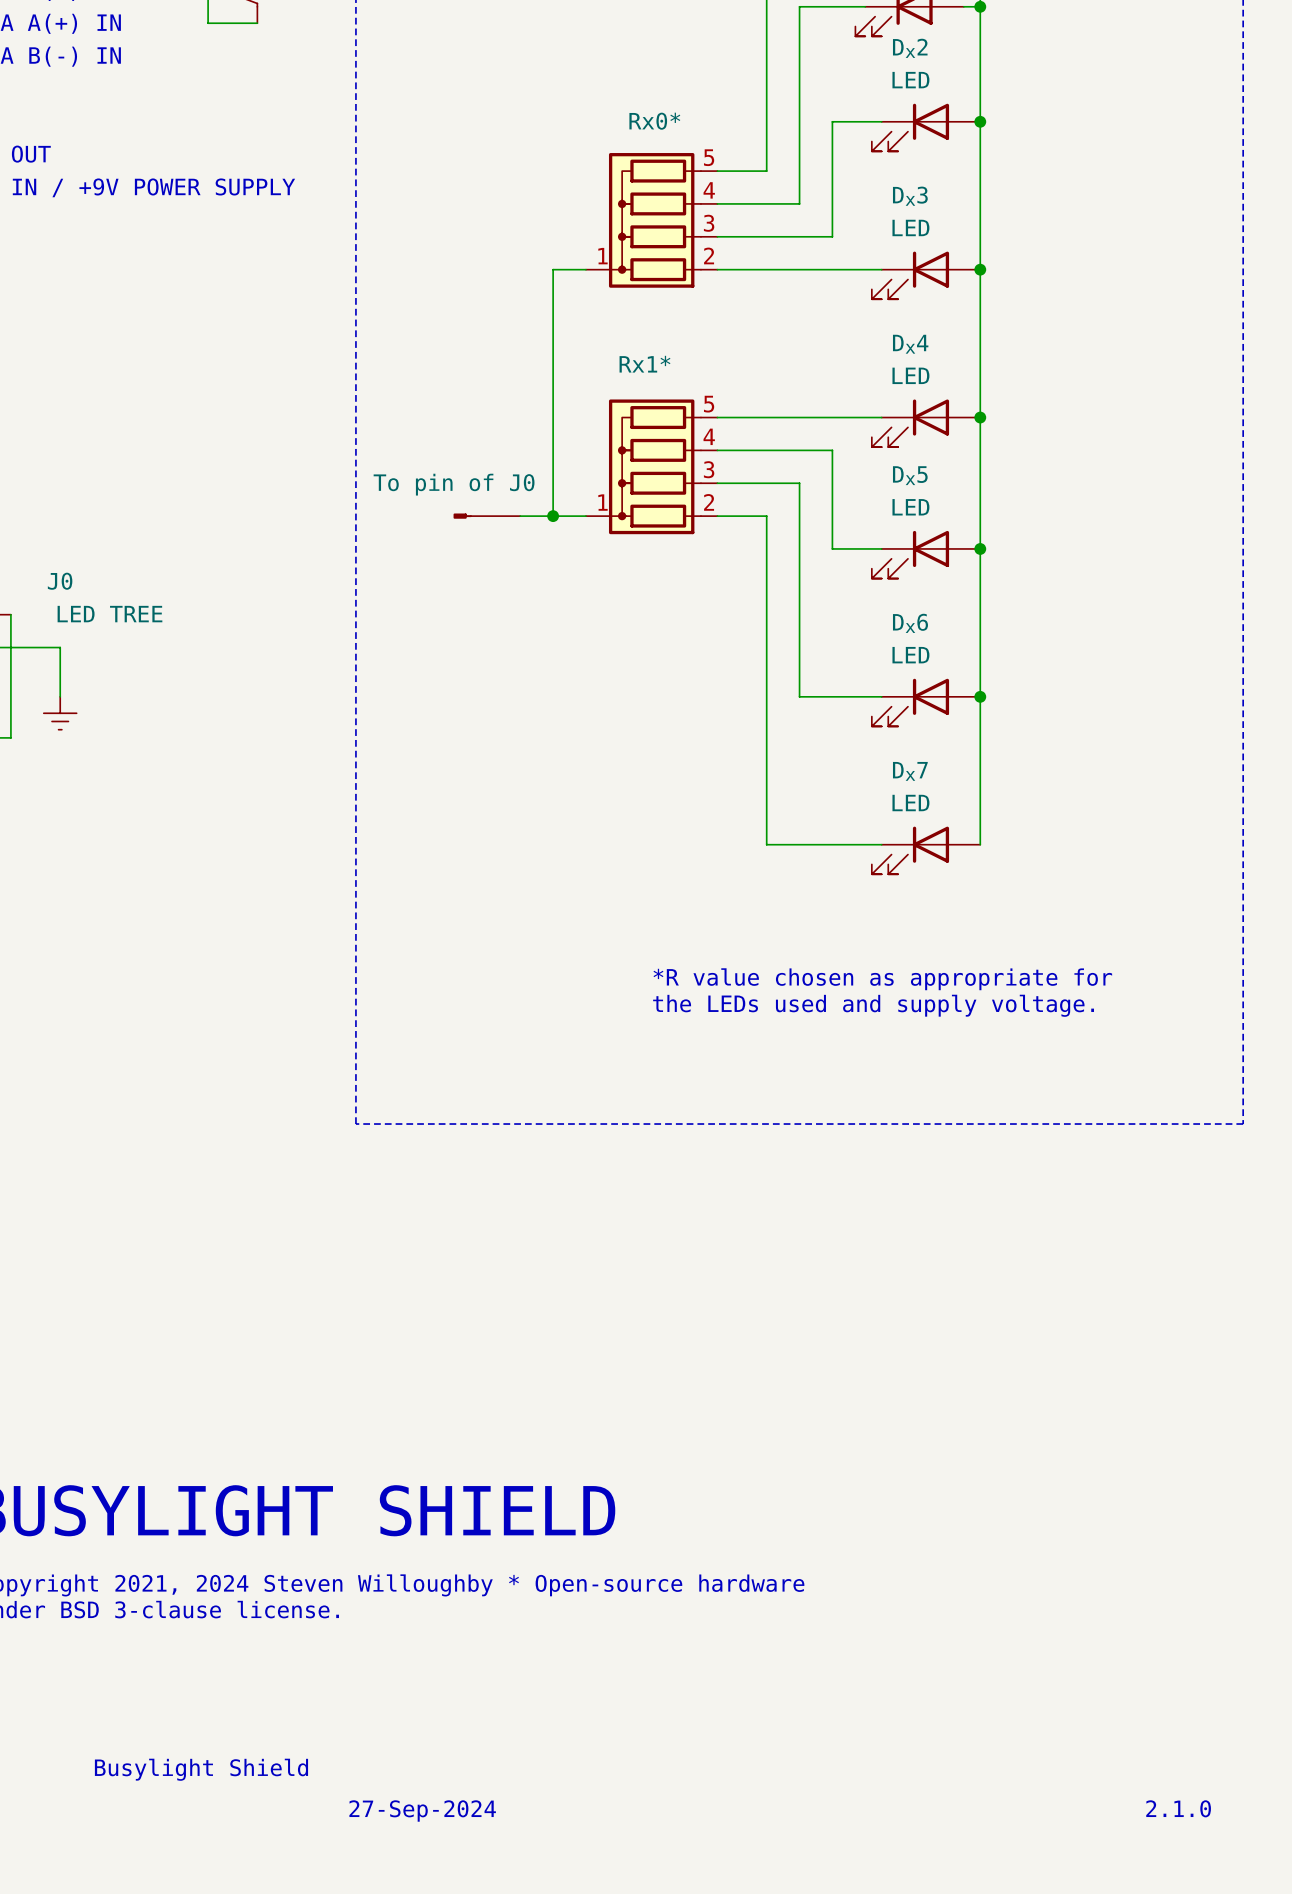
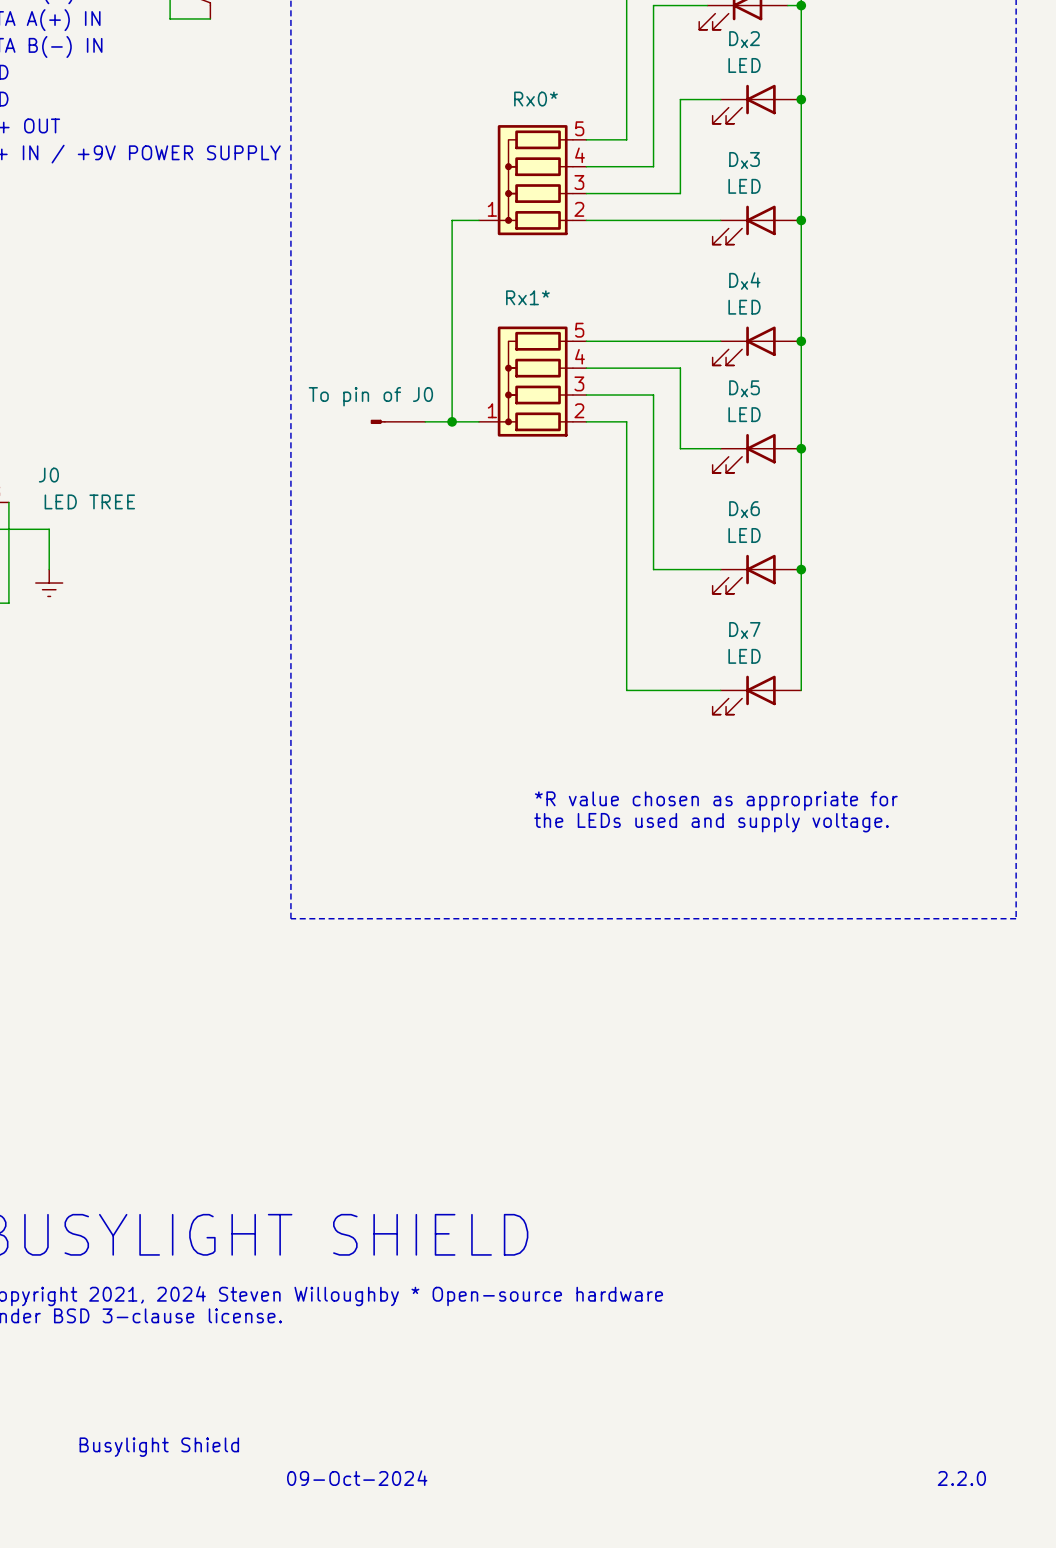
text: 2.1.0 (1178, 1808) -> 2.2.0 (961, 1478)
text: 27-Sep-2024 (422, 1811) -> 09-Oct-2024 (357, 1478)

